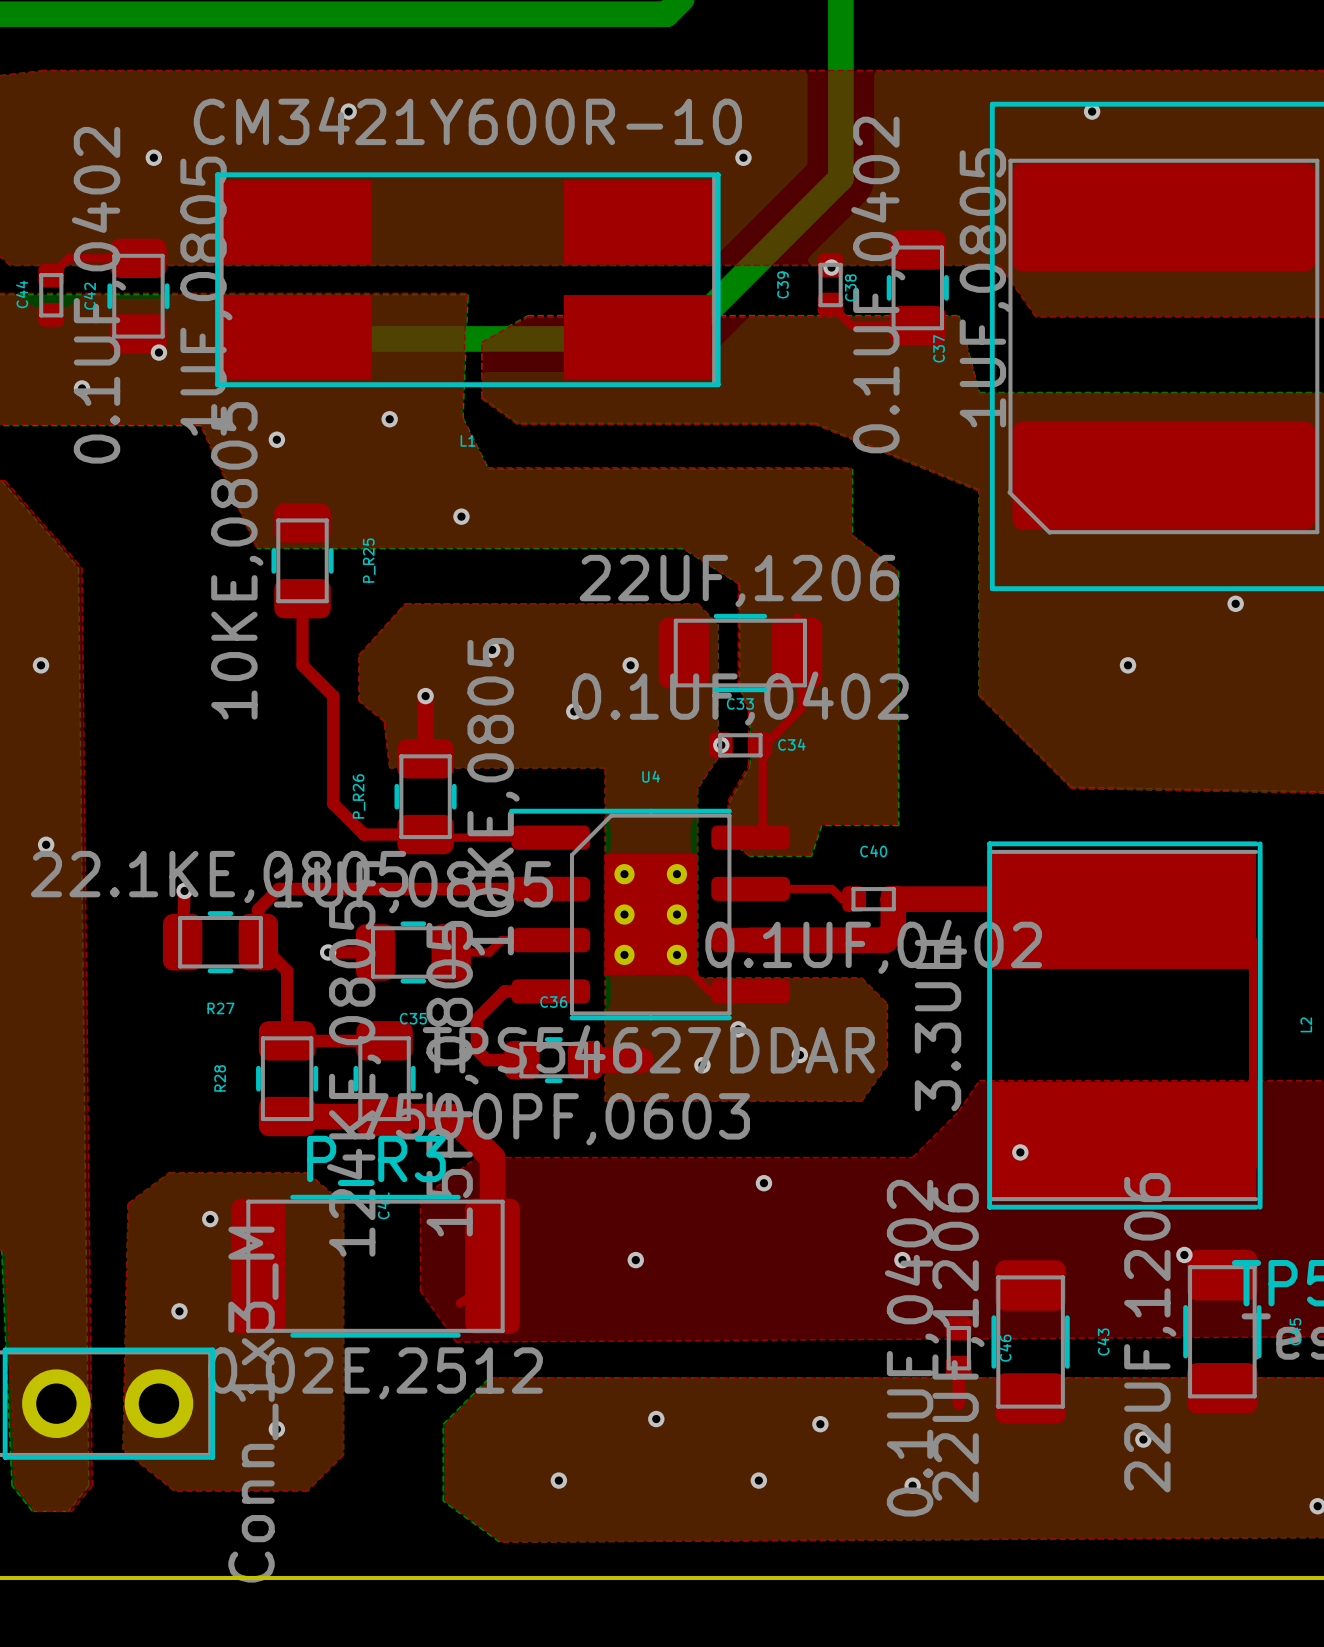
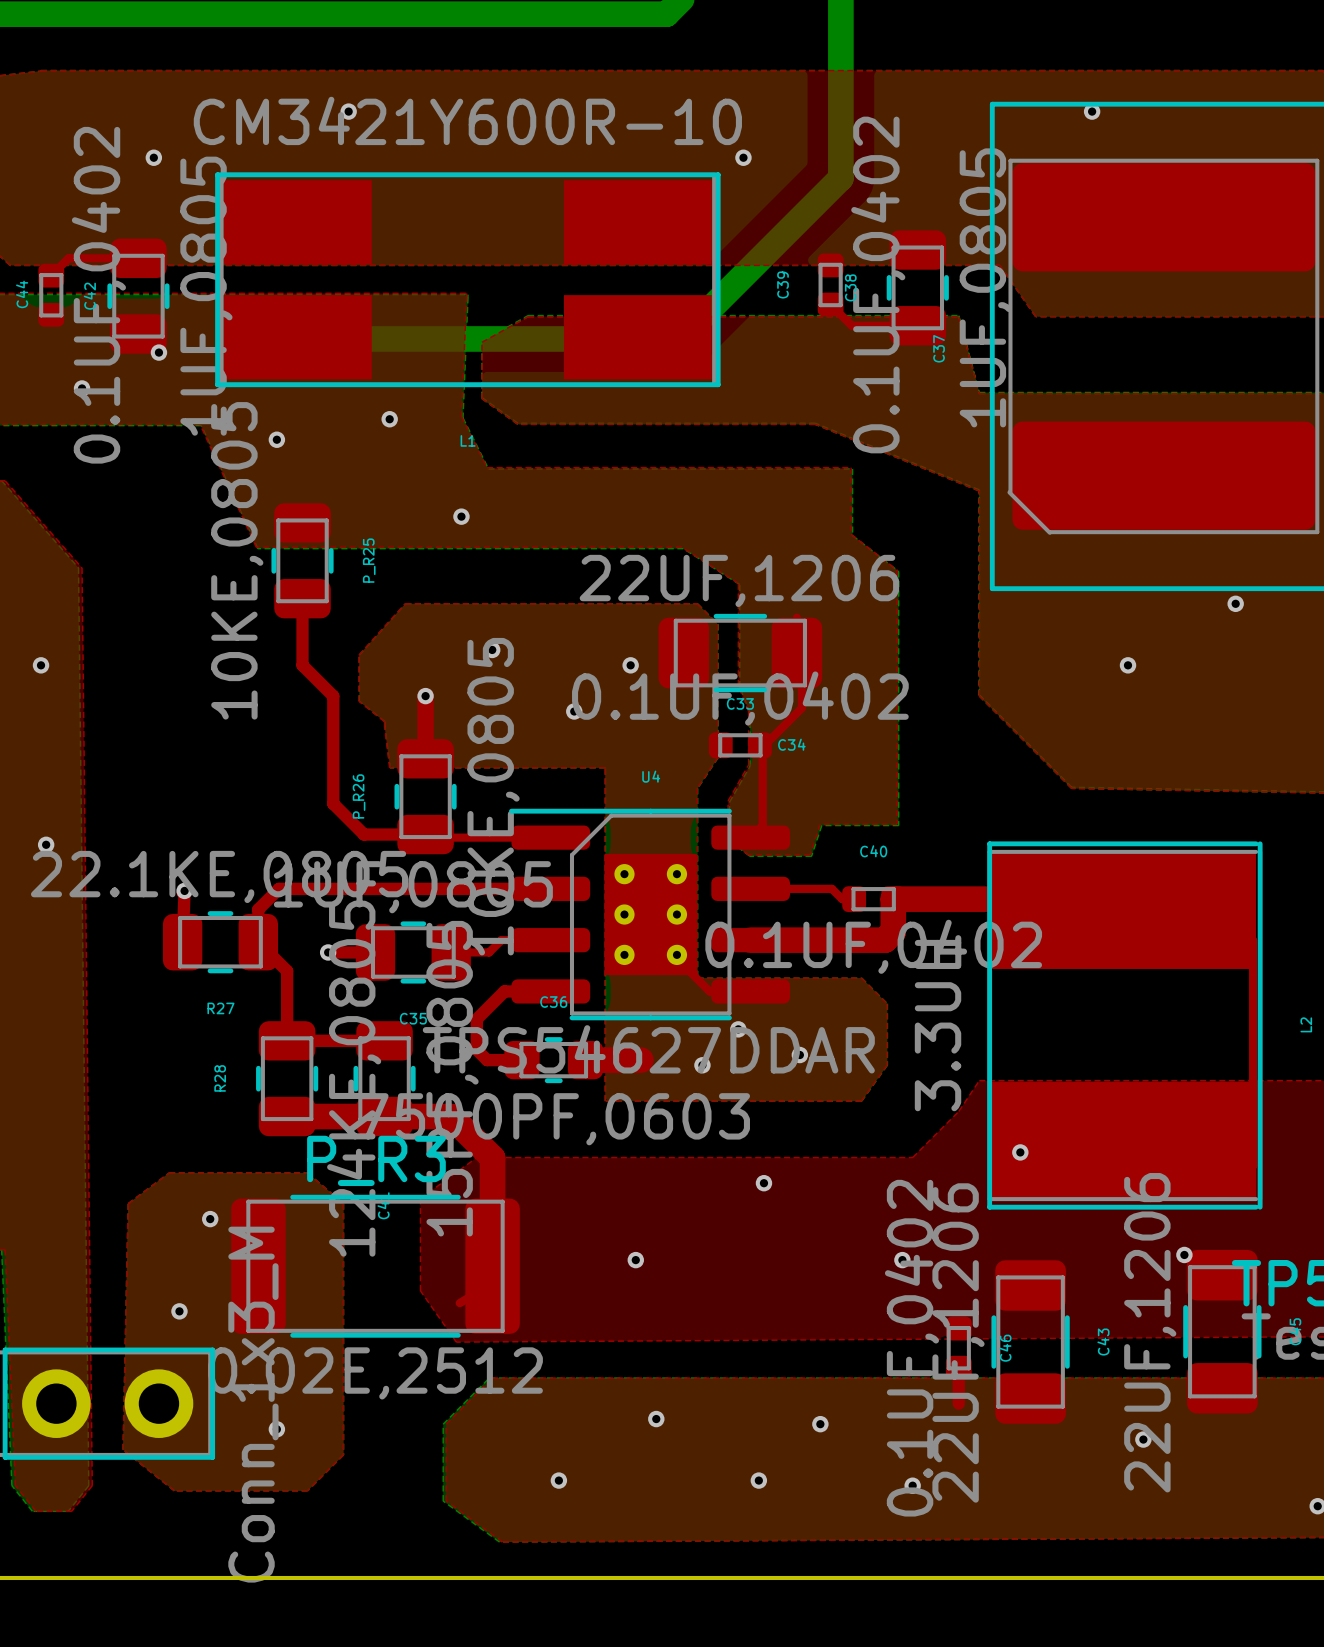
via: (831, 267) -> none
via: (721, 745) -> none

